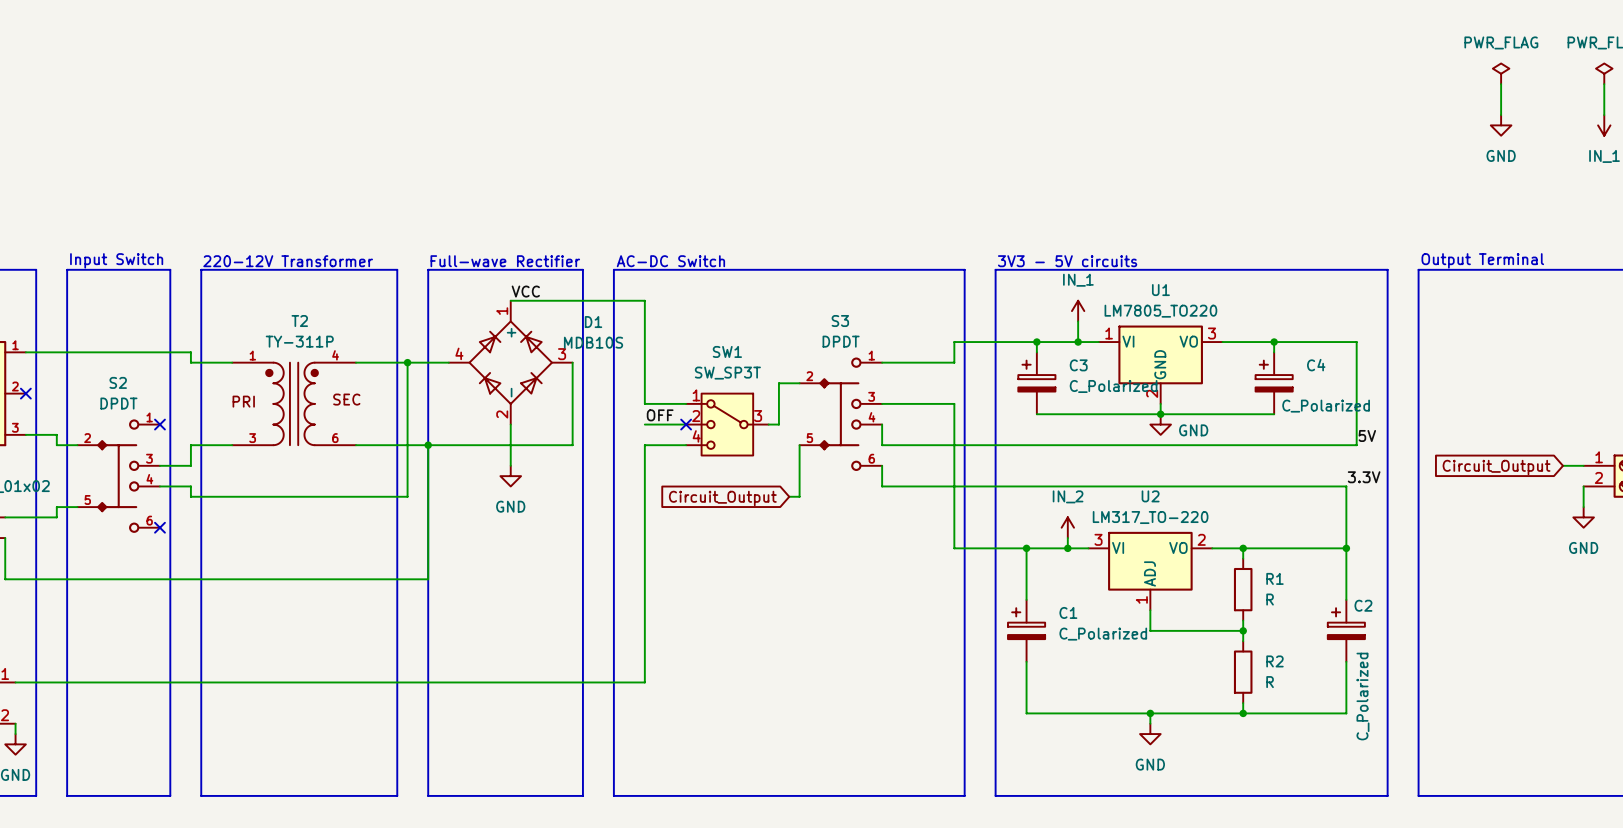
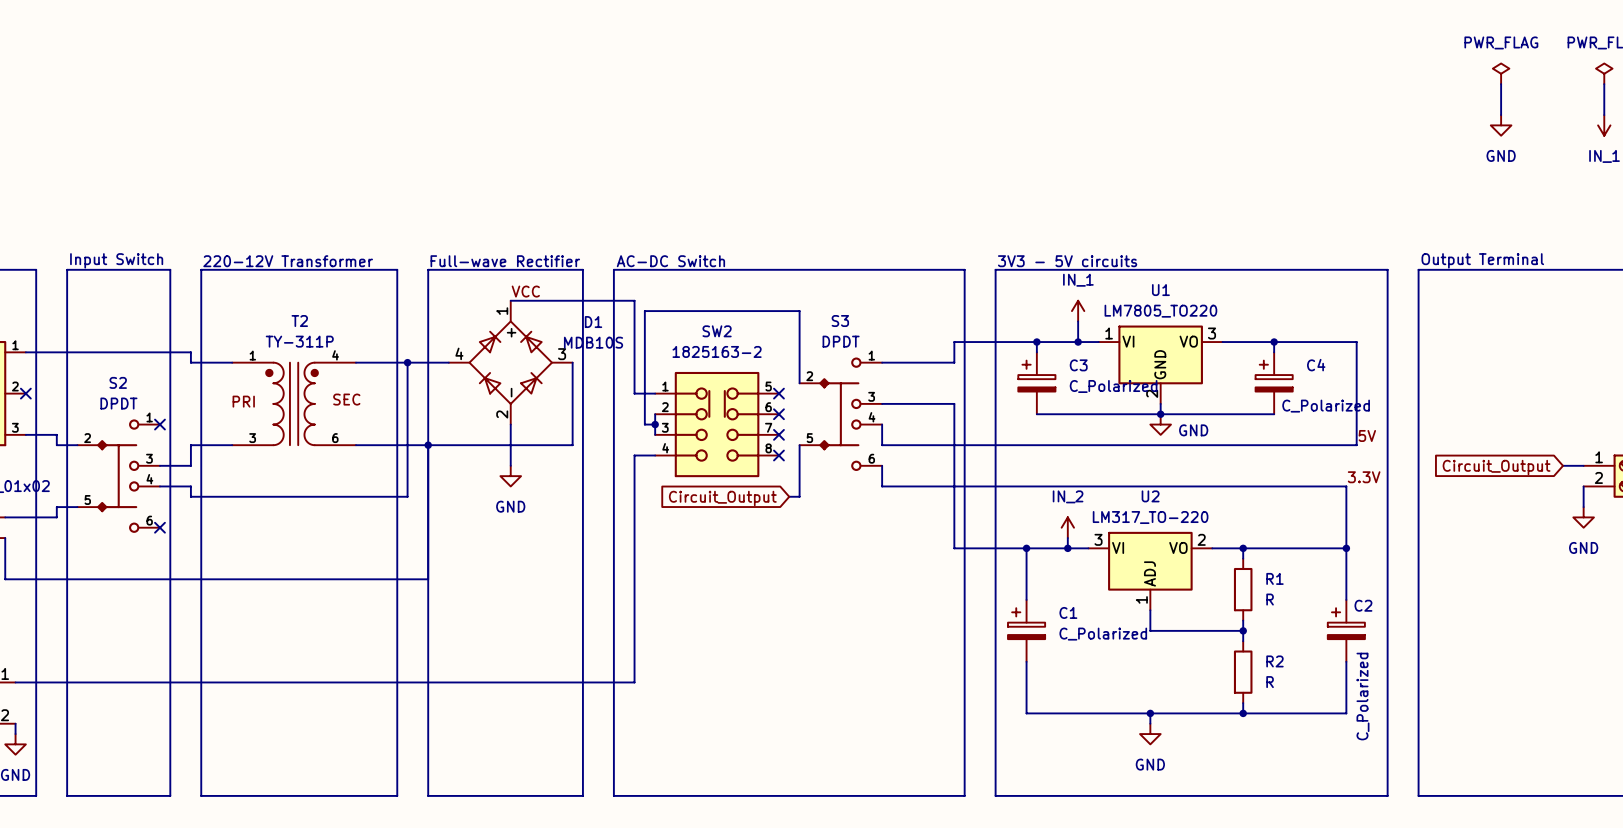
wire: (634, 300) (644, 300) (644, 311) -> (634, 300) (634, 393) (655, 393)
wire: (799, 383) (778, 383) (778, 424) (768, 424) -> (799, 383) (799, 311) (644, 311)
no-connect mark: none -> (778, 393)
wire: (644, 403) (686, 403) -> (644, 403) (644, 424)
wire: none -> (655, 414) (655, 434)
no-connect mark: none -> (778, 414)
label: OFF (660, 415) -> none
junction: none -> (655, 424)
no-connect mark: (686, 424) -> none
SW2: none -> 1825163-2 (717, 424)
SW1: SW_SP3T (727, 424) -> none
no-connect mark: none -> (778, 434)
wire: (686, 445) (644, 445) (644, 682) (634, 682) -> (655, 455) (634, 455) (634, 682)
no-connect mark: none -> (778, 455)

